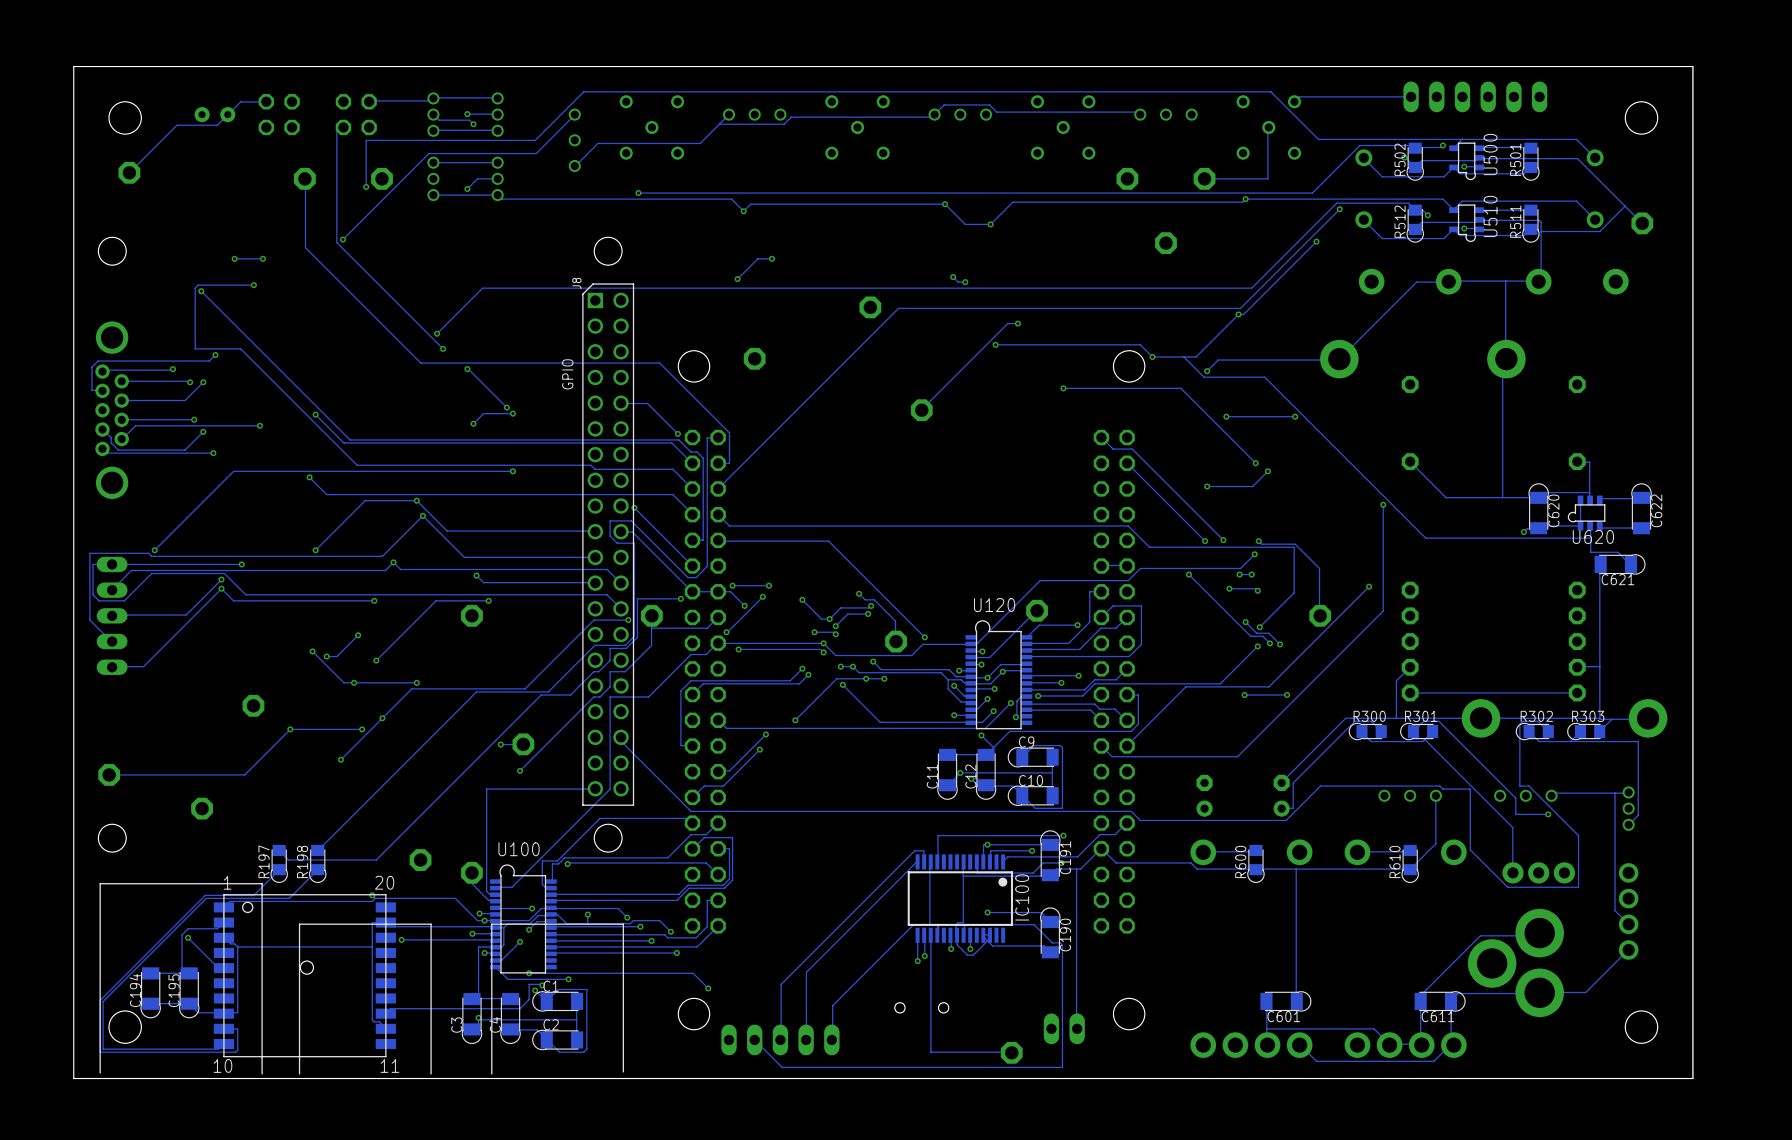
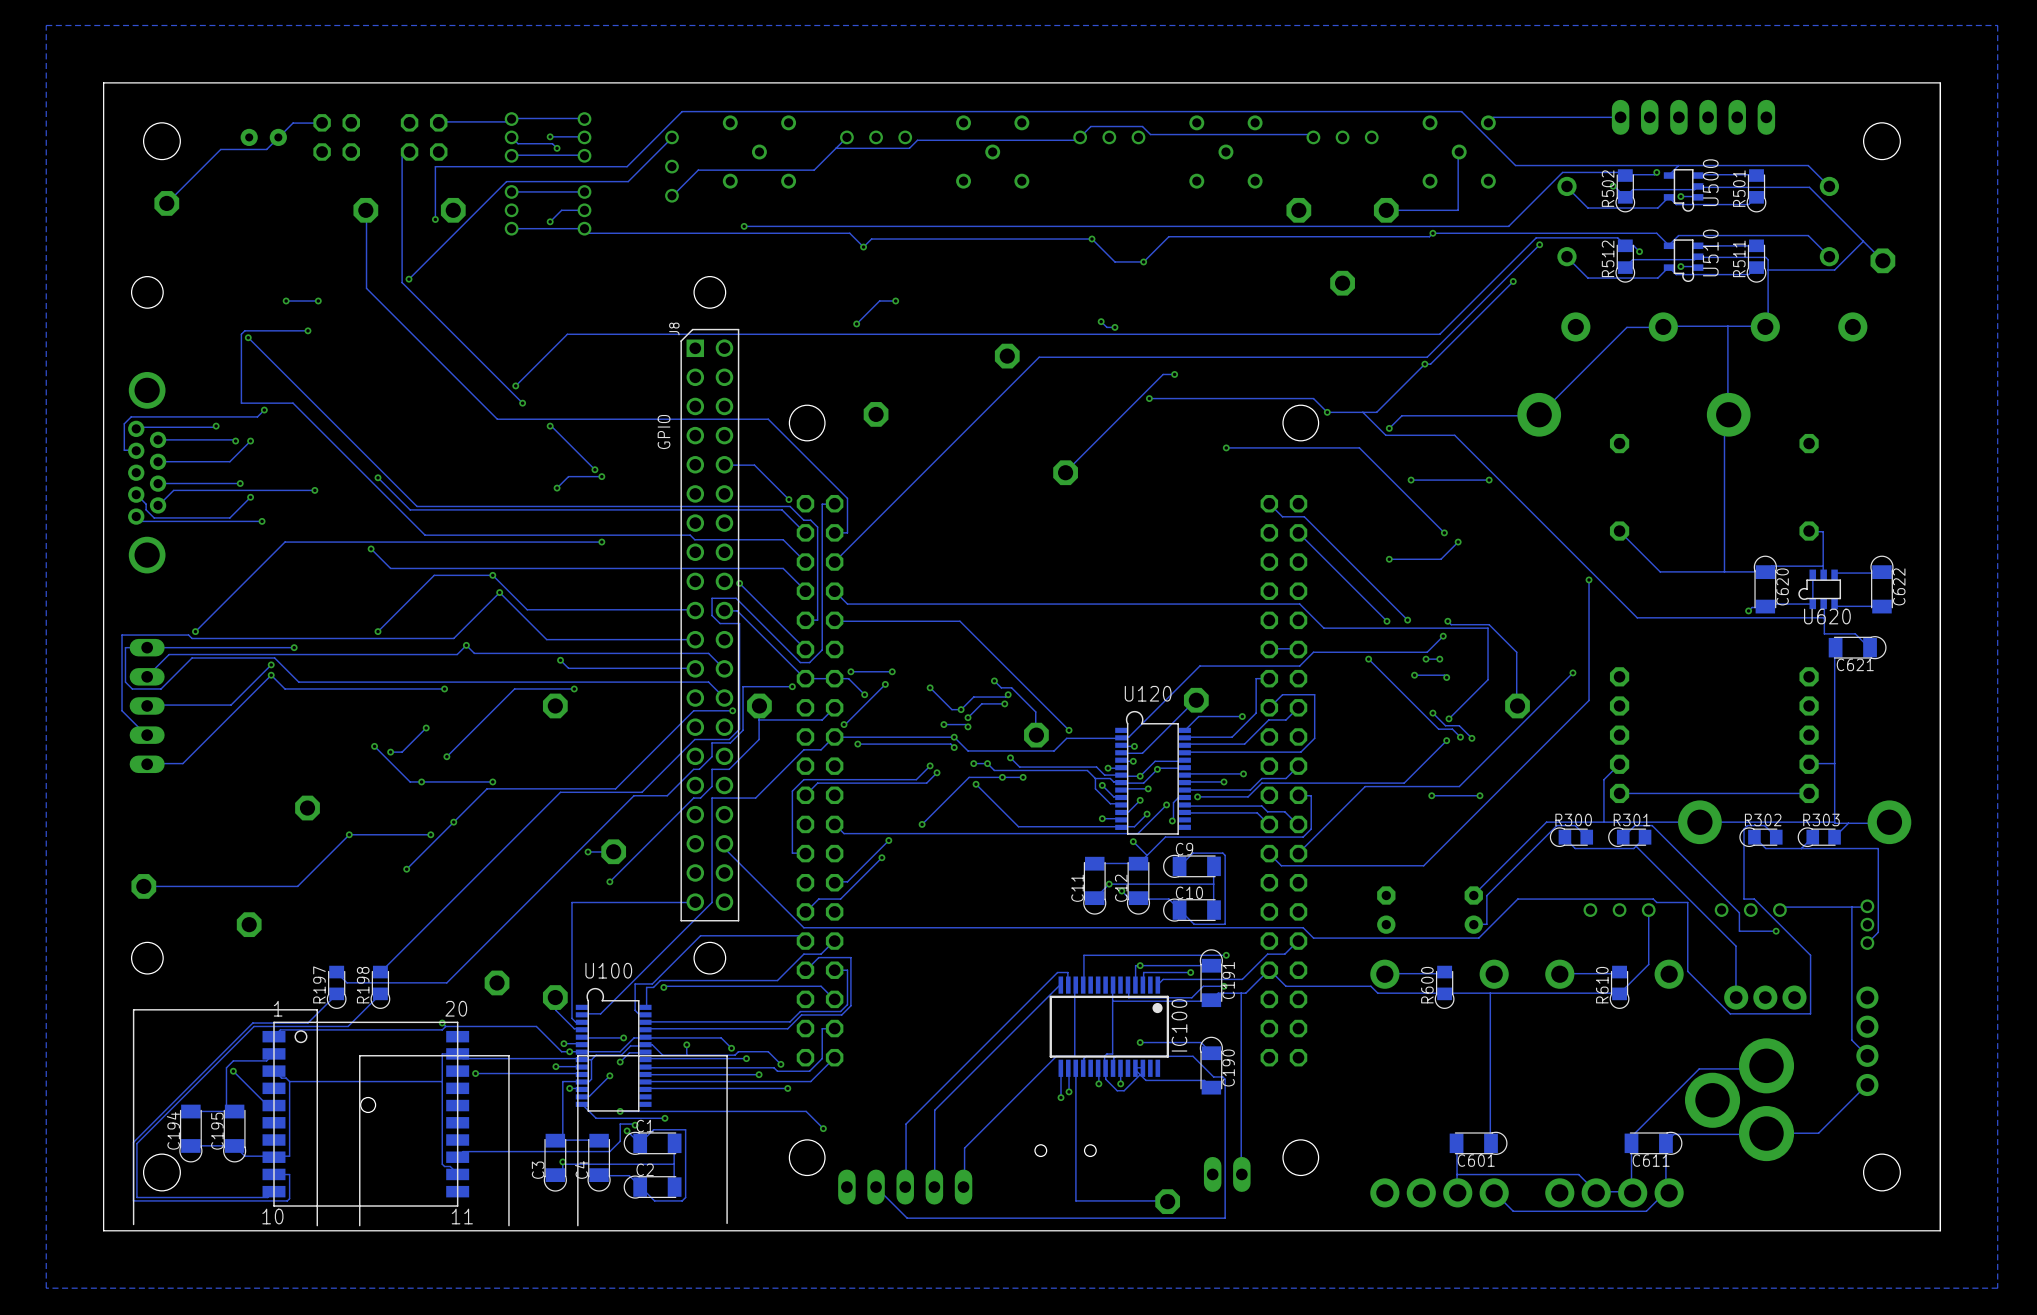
zone outline: none -> (1997, 25) (46, 25) (46, 1288) (1997, 1288) (1997, 25)

